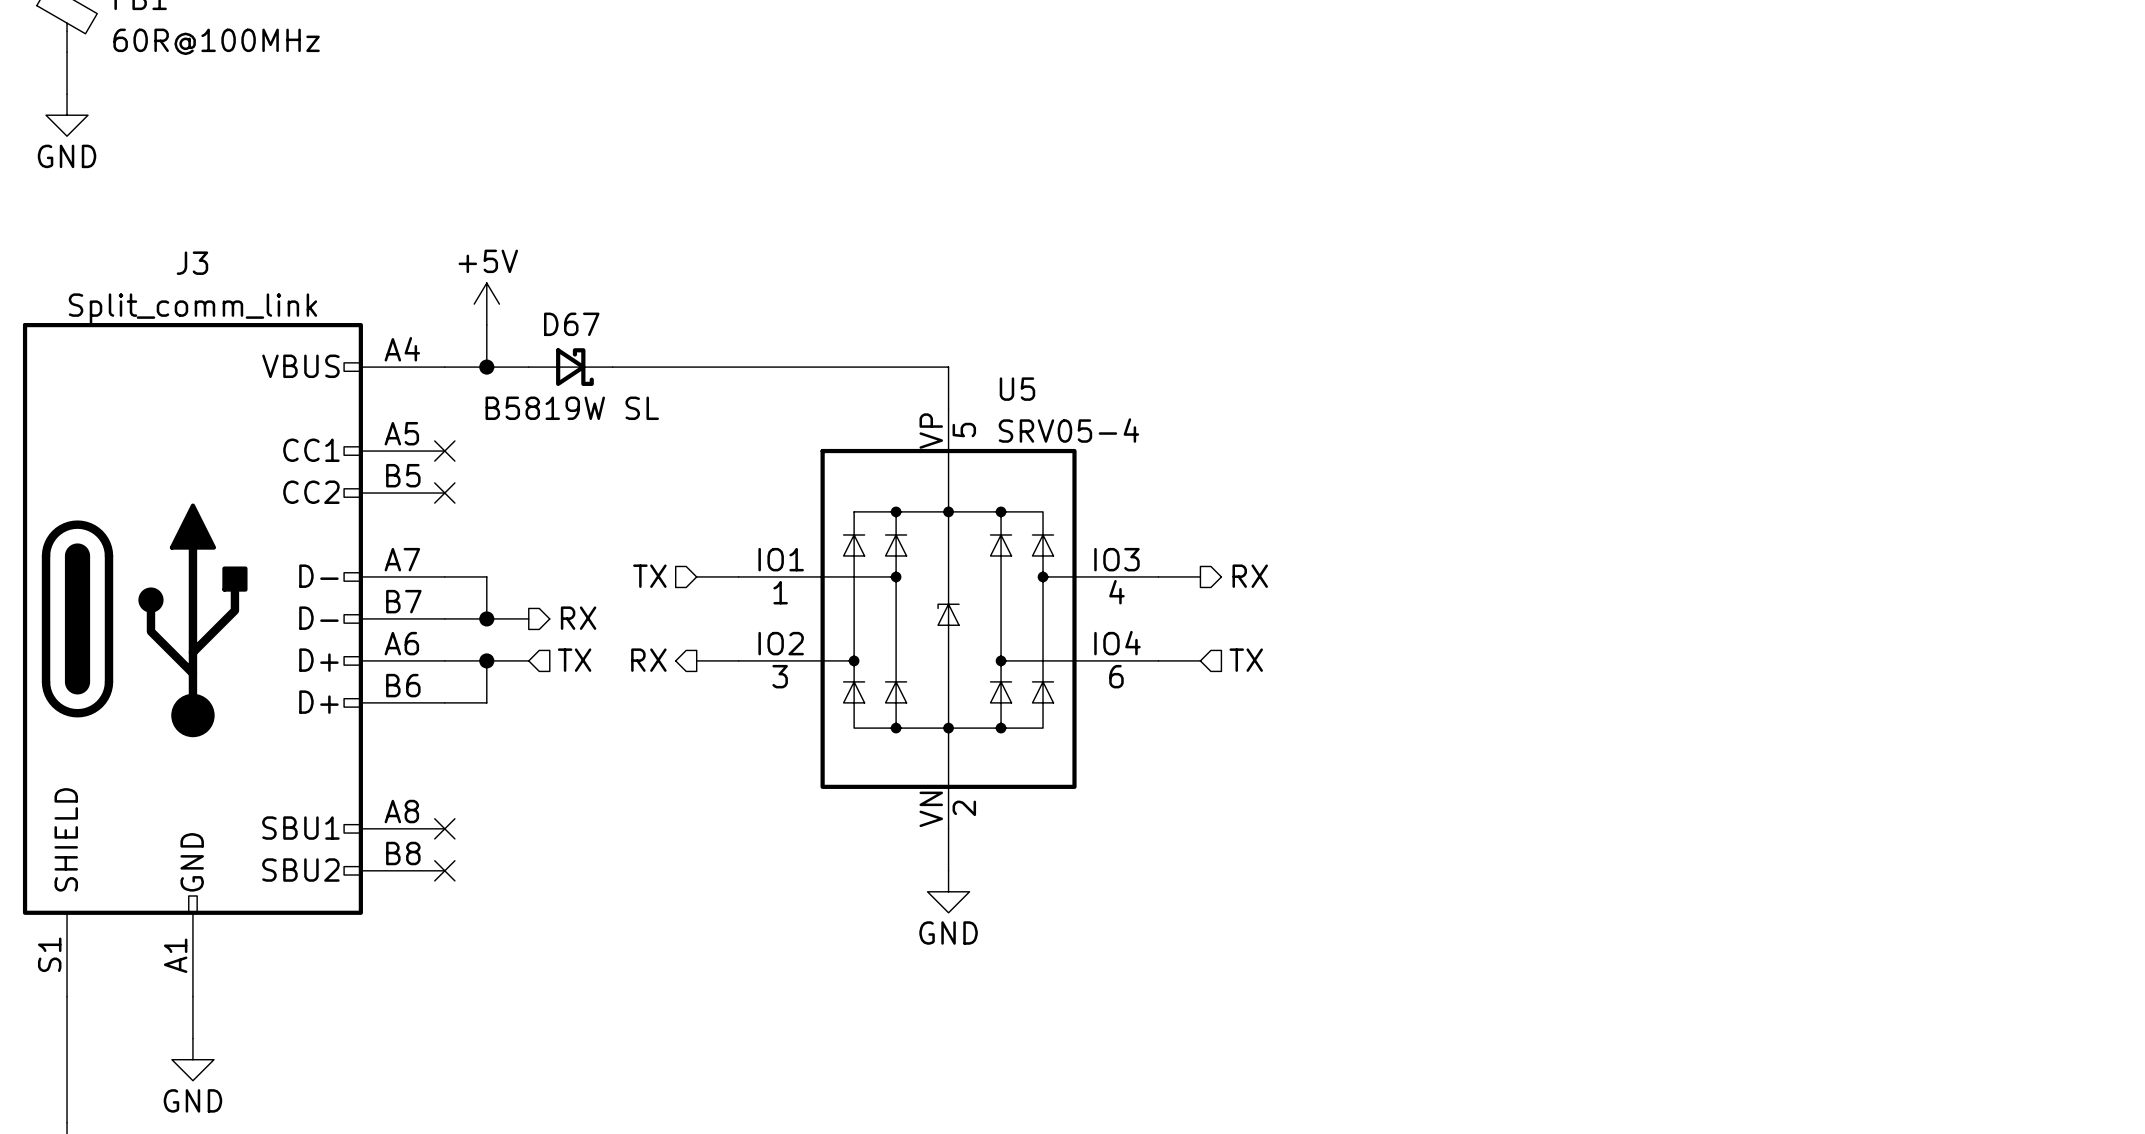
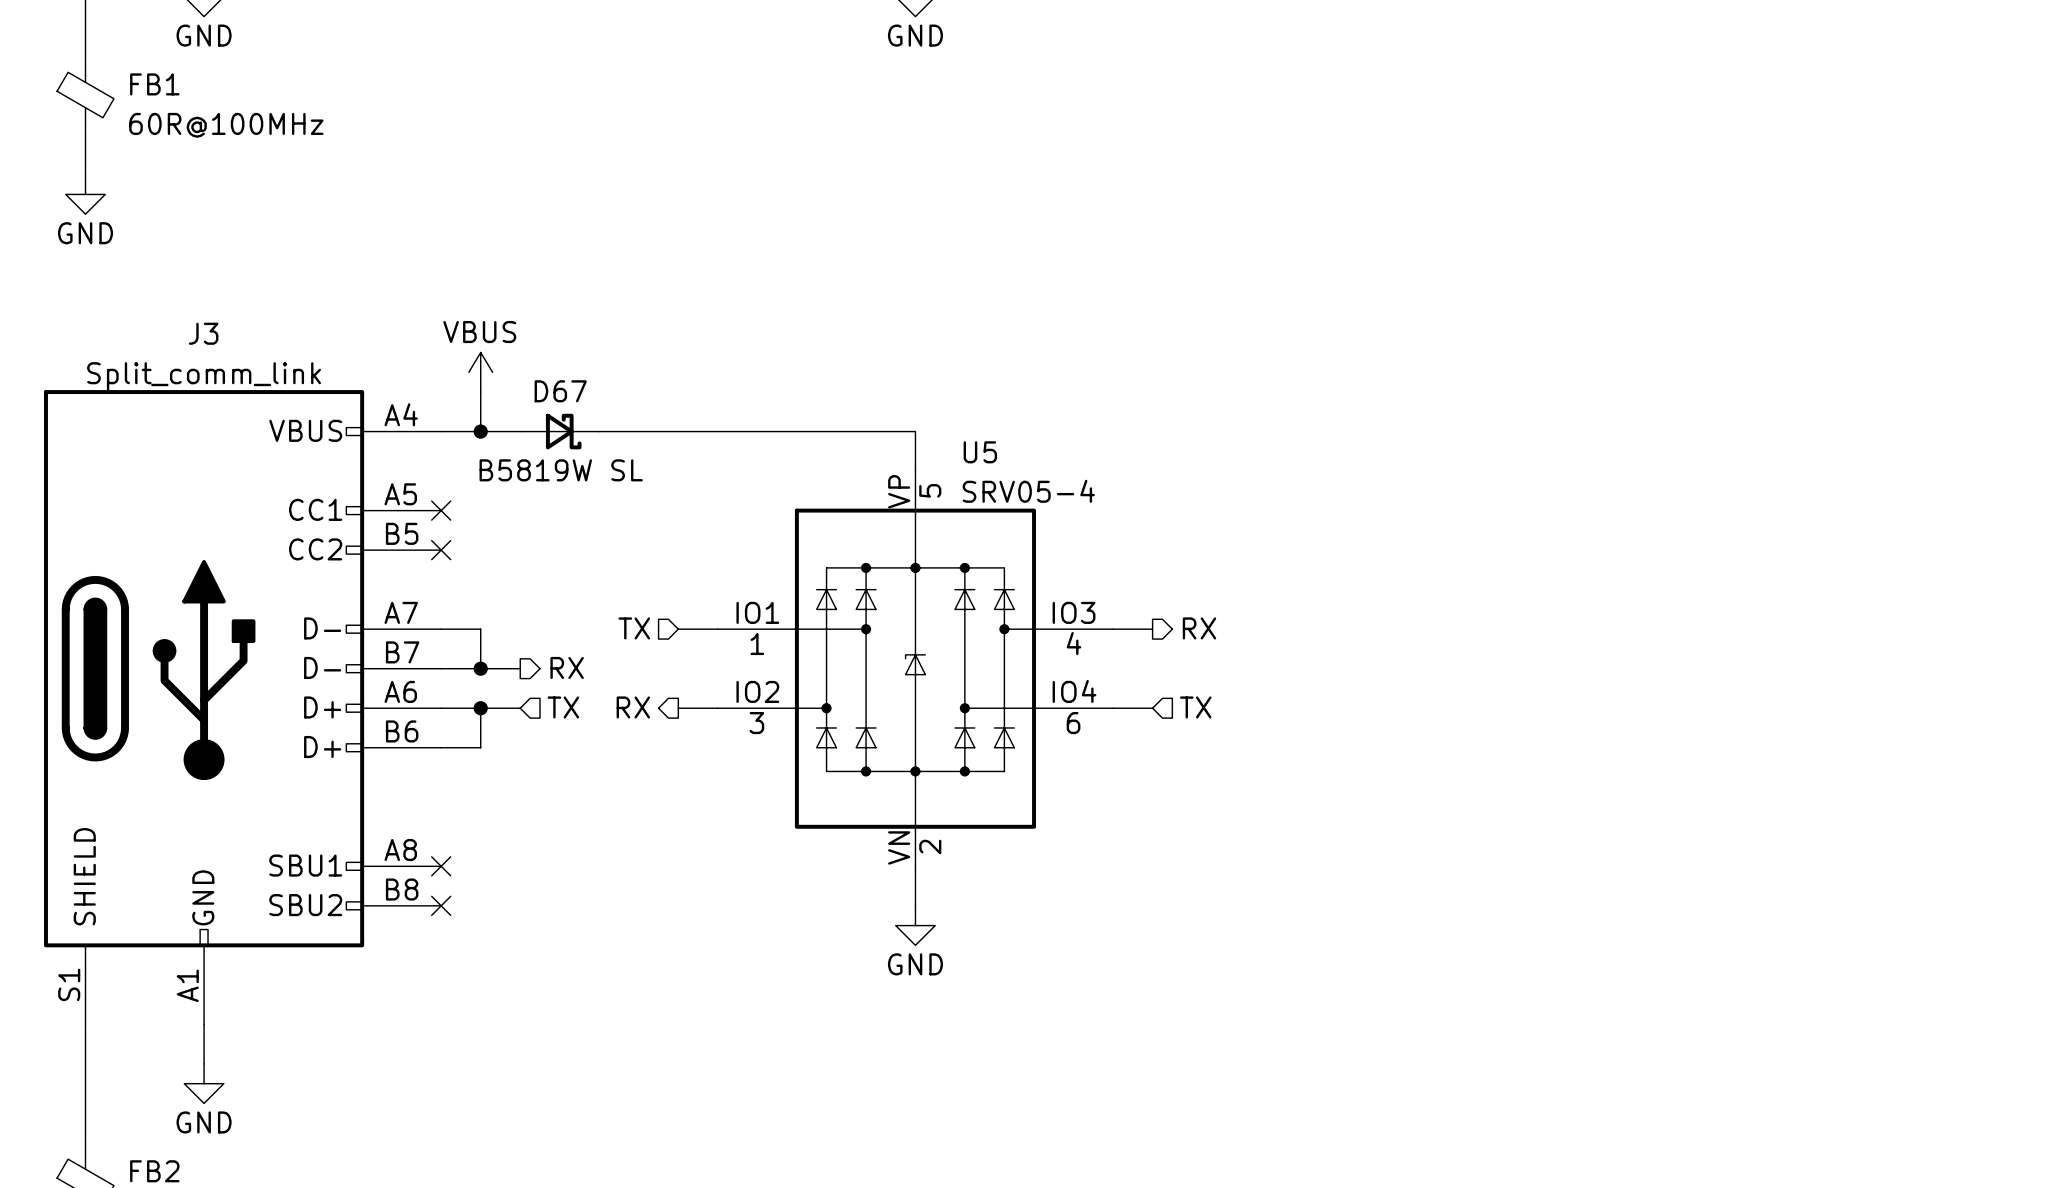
power symbol: +5V (486, 304) -> VBUS (480, 372)

